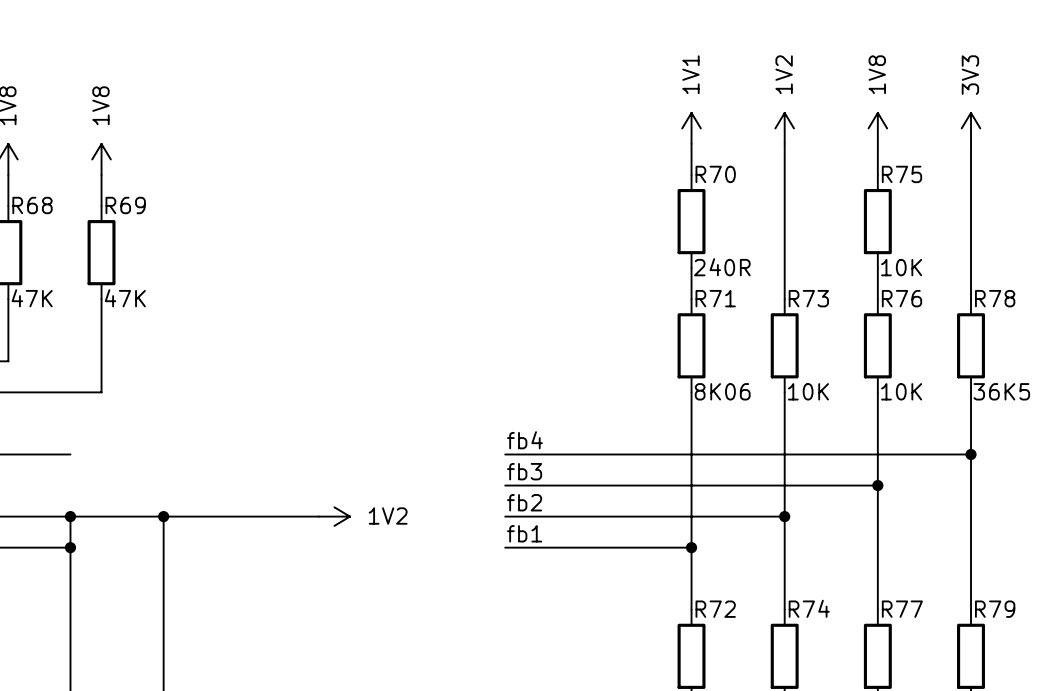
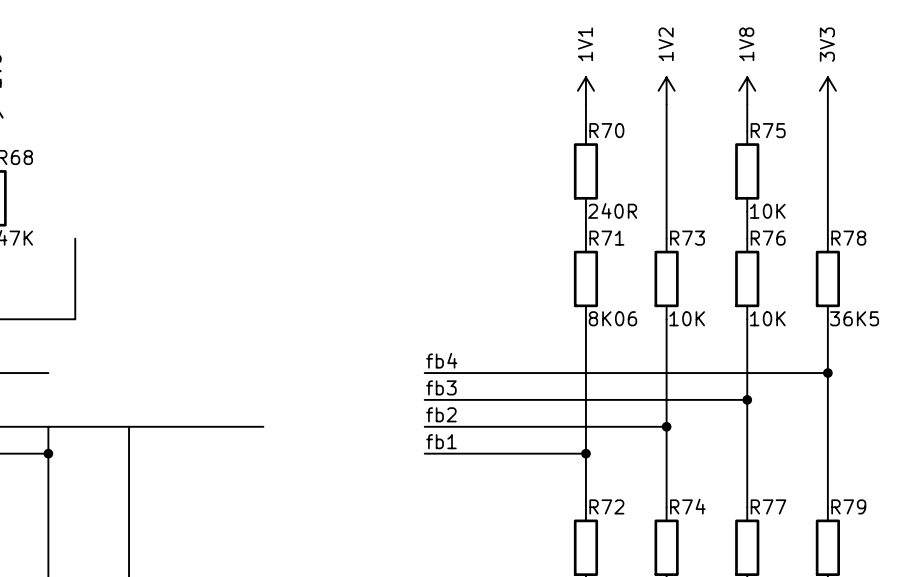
power symbol: 1V8 (101, 159) -> none
wire: (101, 175) (101, 206) -> none
R69: 47K (101, 252) -> none
junction: (70, 516) -> none
junction: (163, 516) -> none
power symbol: 1V2 (334, 516) -> none

